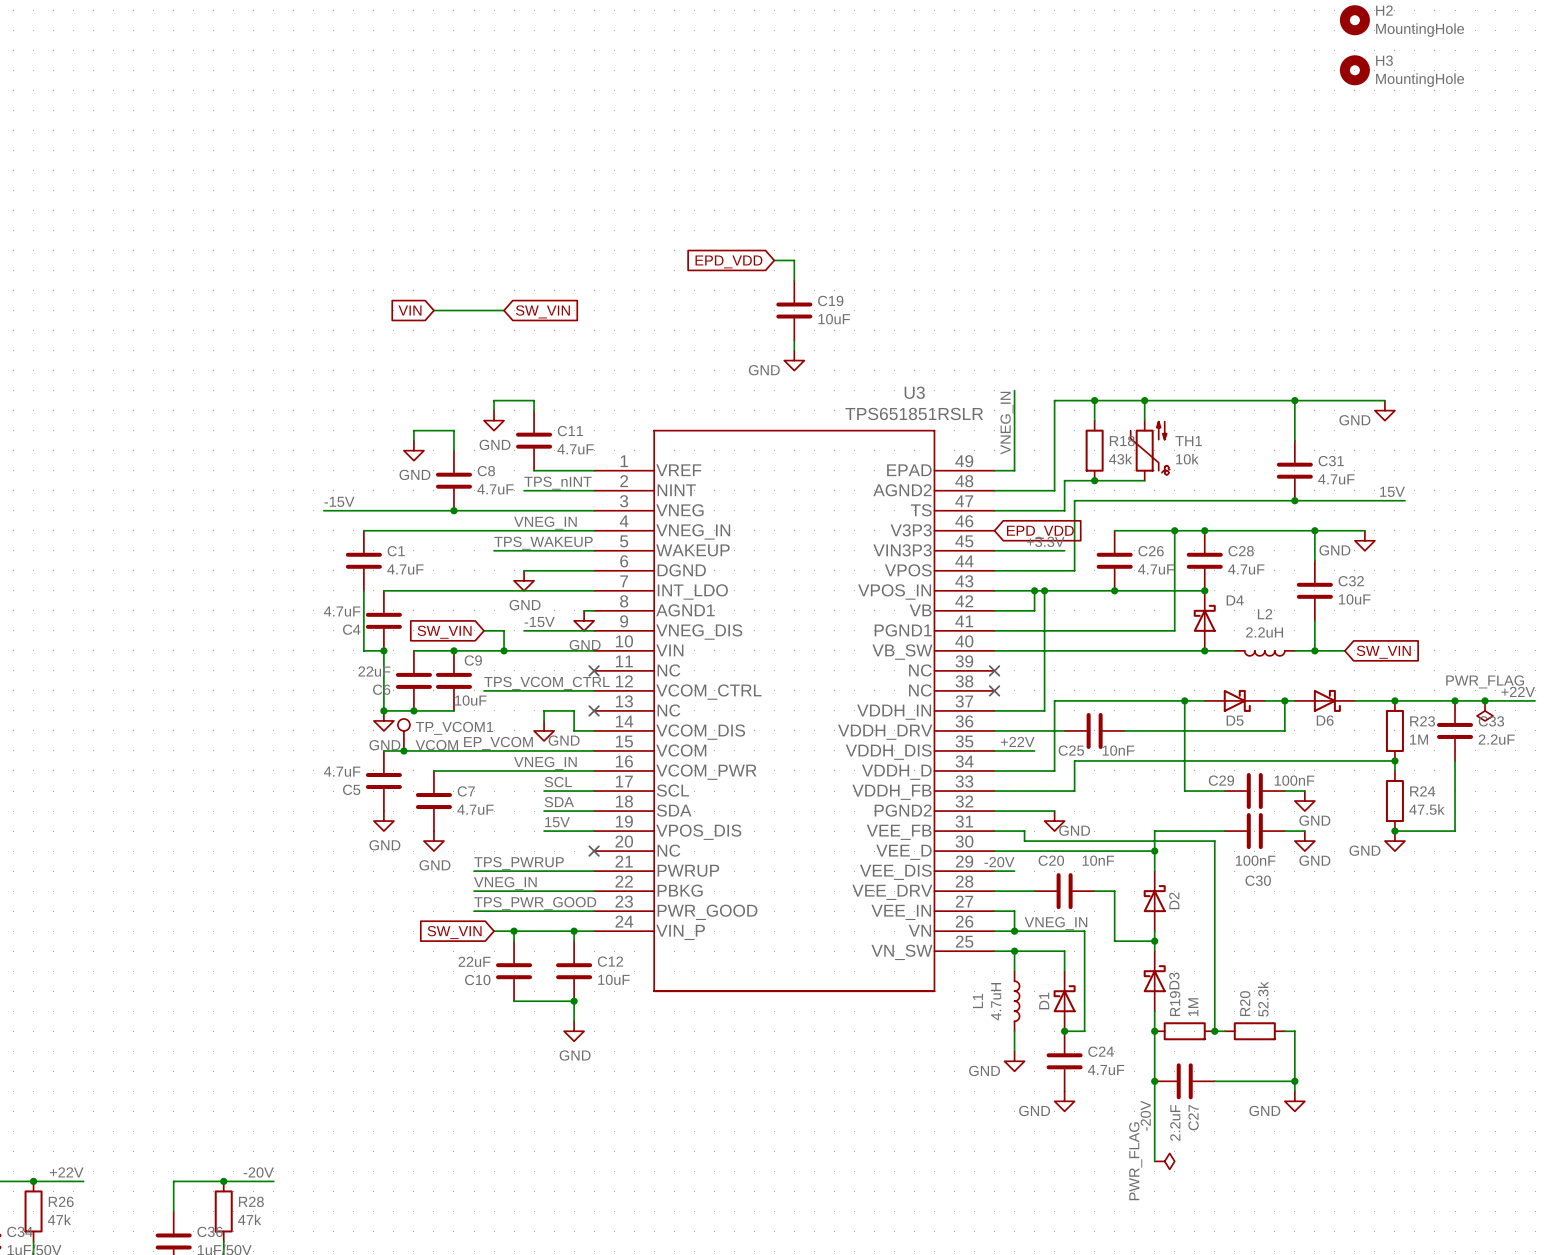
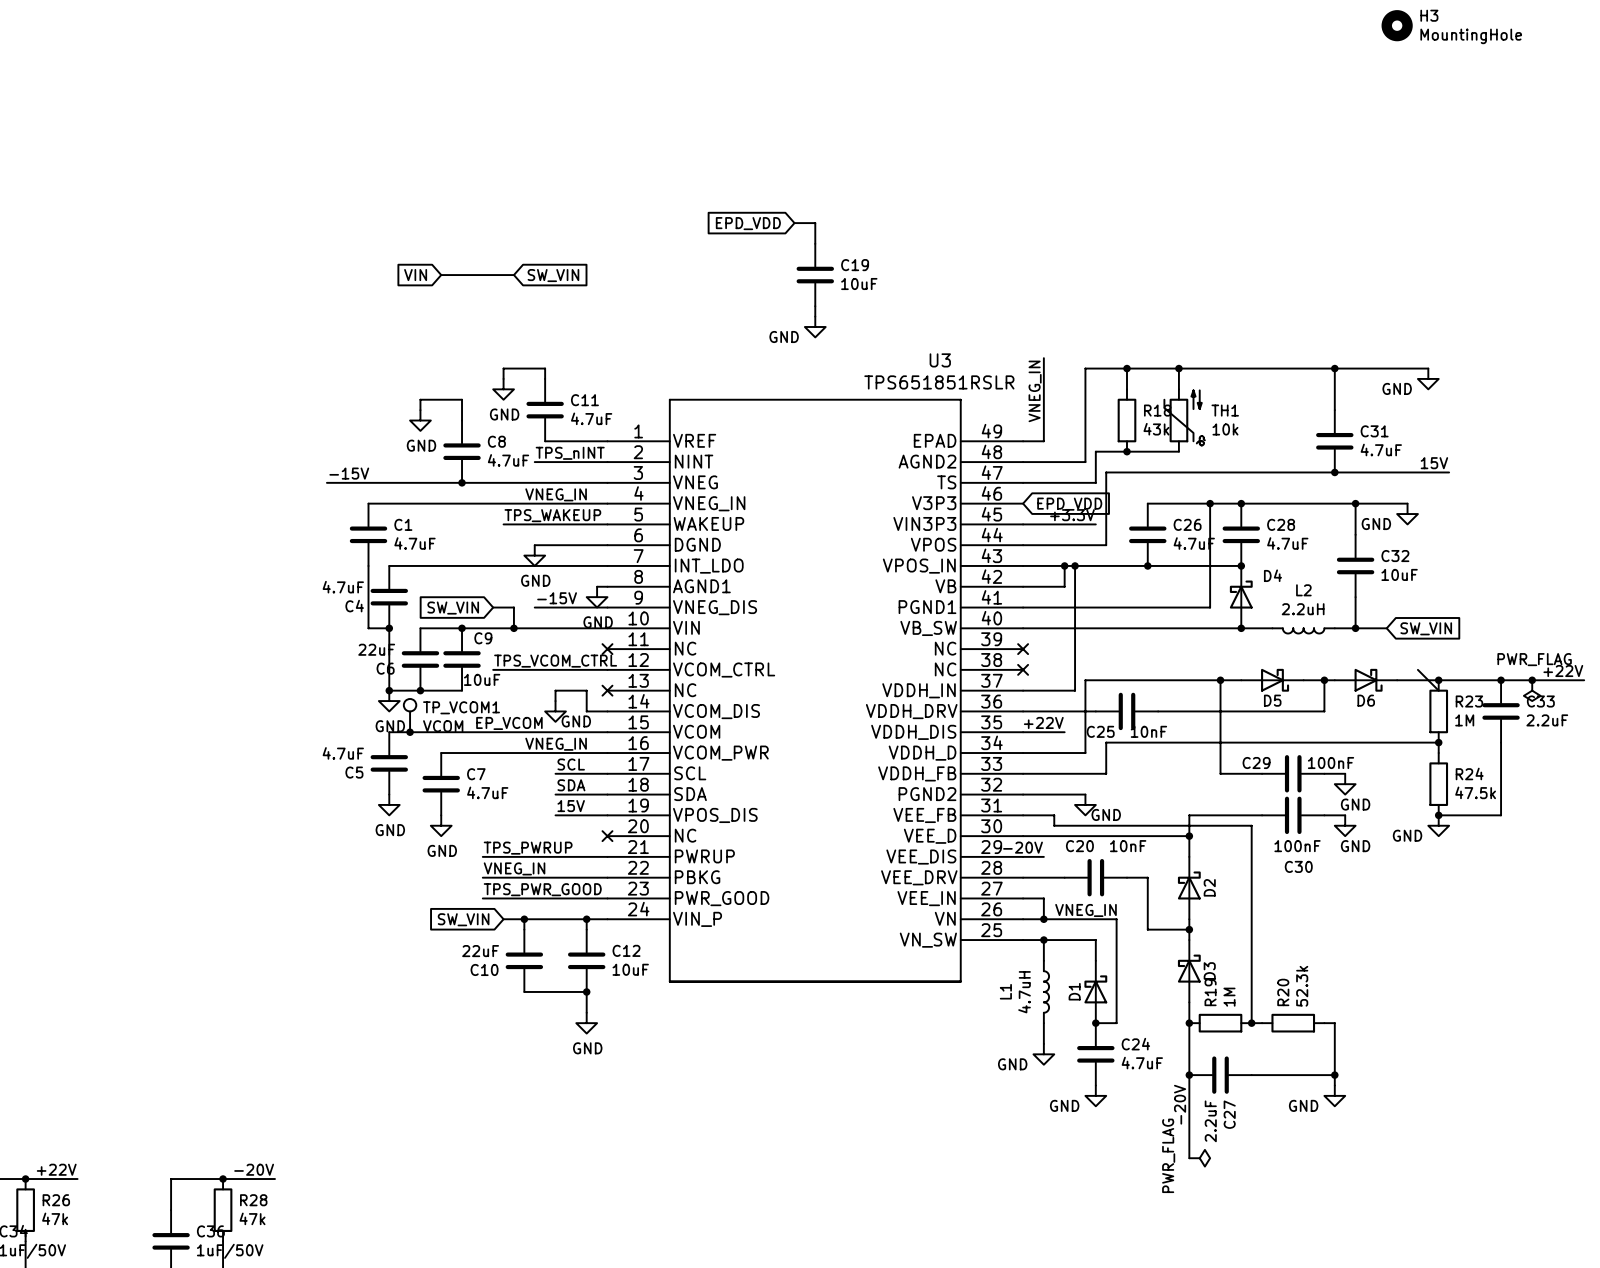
bus: none -> (1417, 669) (1438, 690)

